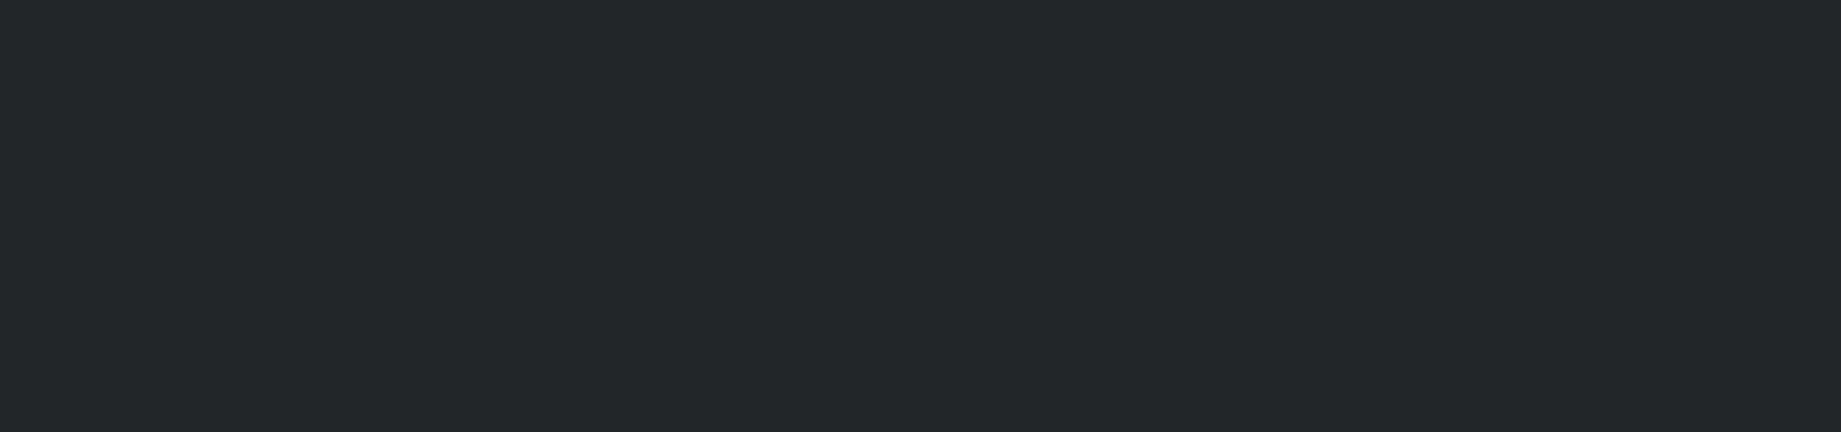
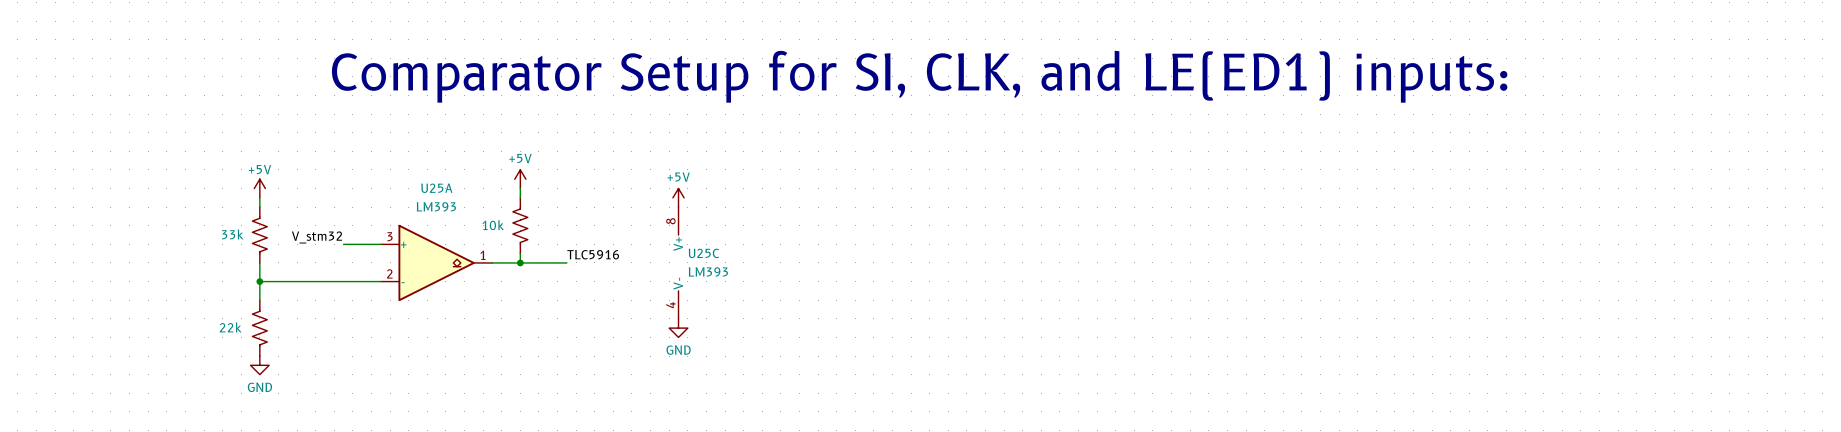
text: none -> Comparator Setup for SI, CLK, and LE(ED1) inputs: (919, 76)
power symbol: none -> +5V (520, 179)
power symbol: none -> +5V (259, 188)
wire: none -> (520, 188) (520, 197)
wire: none -> (259, 197) (259, 207)
power symbol: none -> +5V (678, 197)
part: none -> 10k (520, 225)
part: none -> 33k (259, 235)
label: none -> V_stm32 (317, 237)
wire: none -> (343, 244) (380, 244)
wire: none -> (520, 253) (520, 262)
label: none -> TLC5916 (593, 254)
wire: none -> (259, 262) (259, 300)
U25A: none -> LM393 (436, 262)
wire: none -> (492, 262) (566, 262)
junction: none -> (520, 262)
U25C: none -> LM393 (678, 262)
wire: none -> (259, 281) (380, 281)
junction: none -> (259, 281)
part: none -> 22k (259, 328)
power symbol: none -> GND (678, 328)
power symbol: none -> GND (259, 365)

